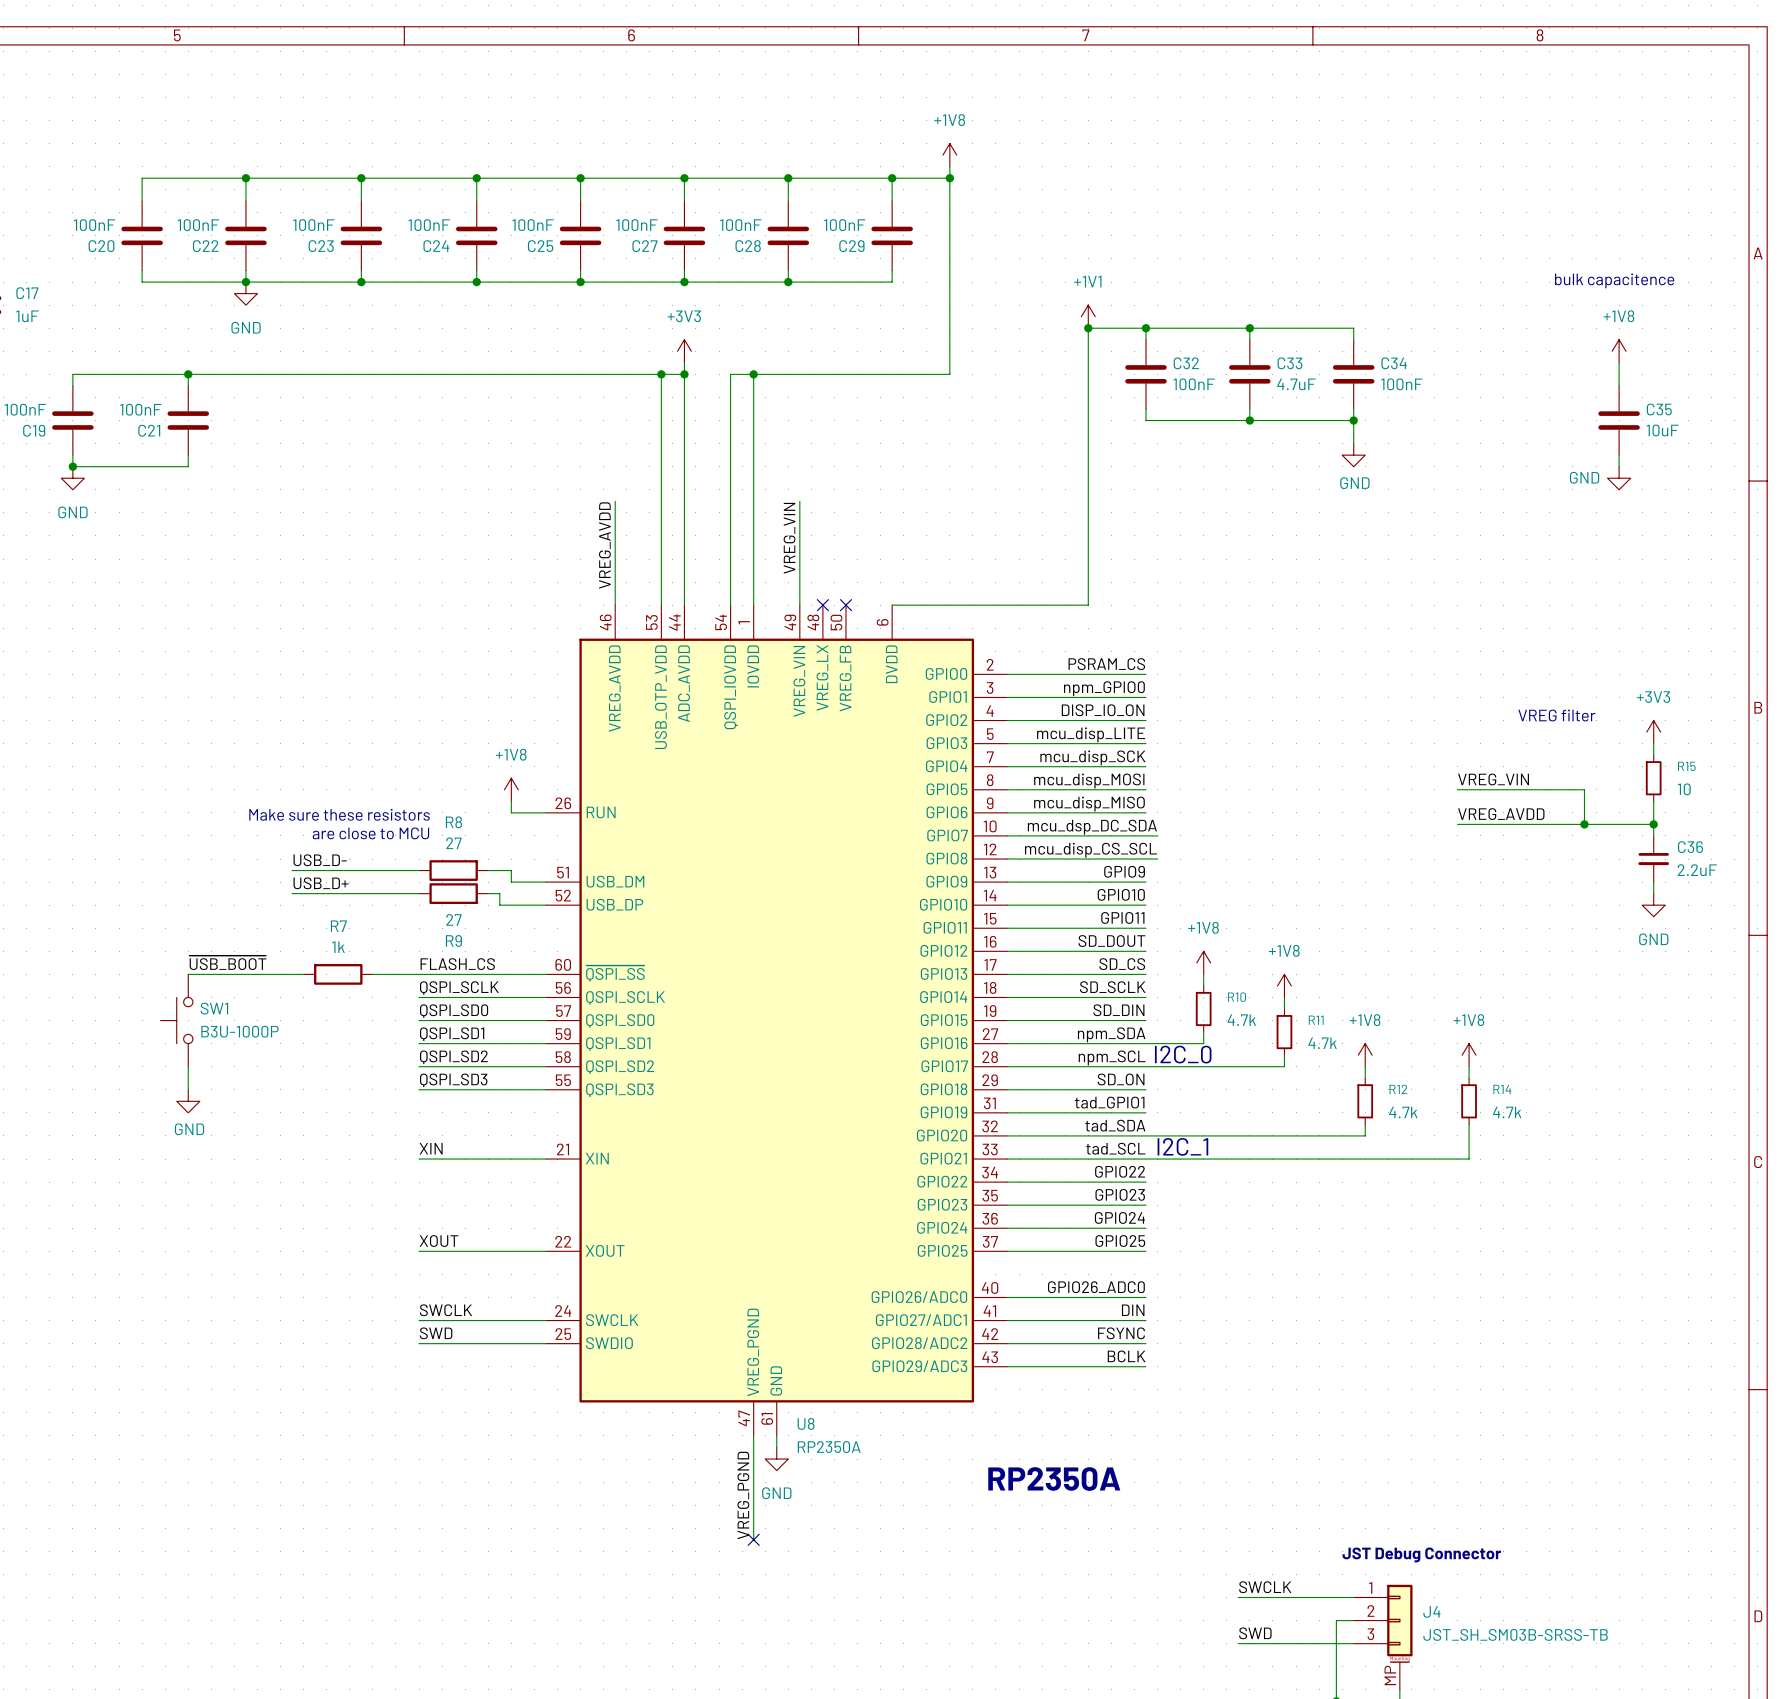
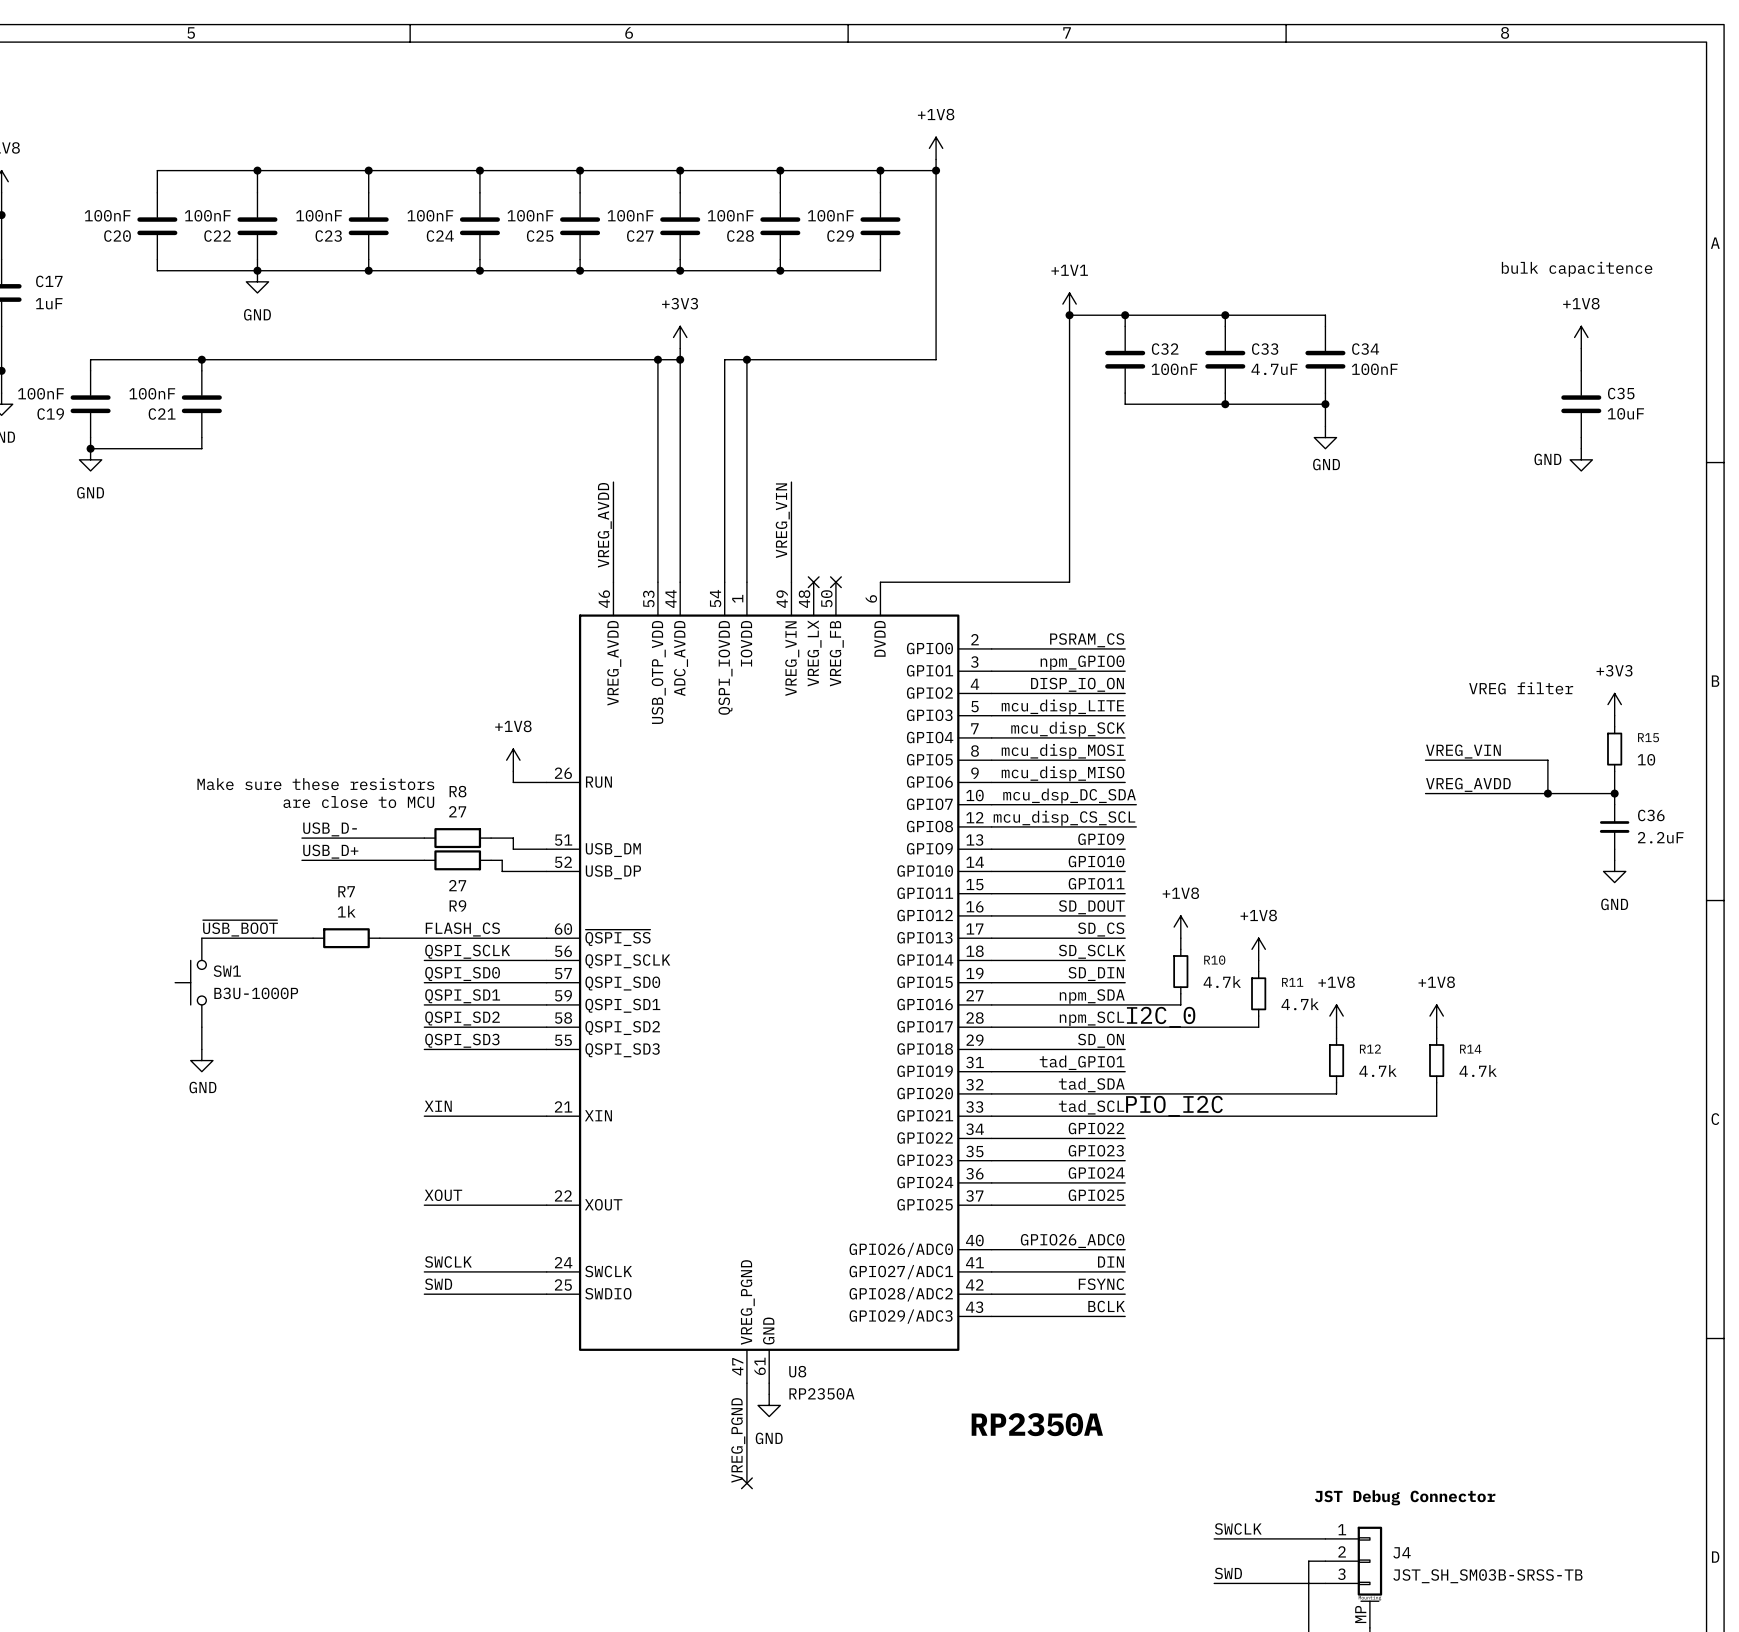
text: I2C_1 (1182, 1146) -> none
text: none -> PIO_I2C (1174, 1106)

